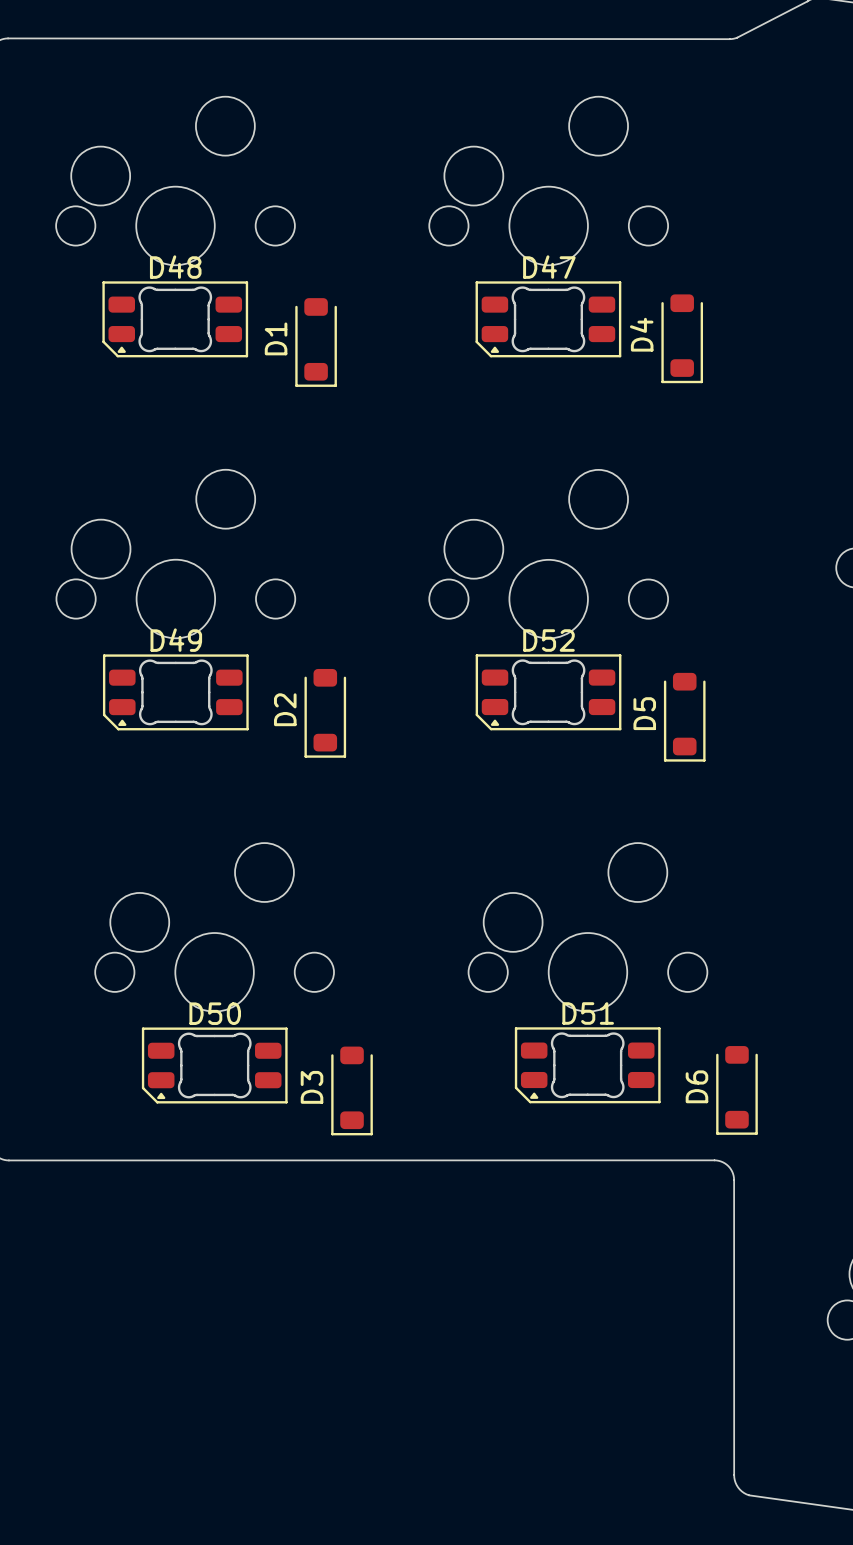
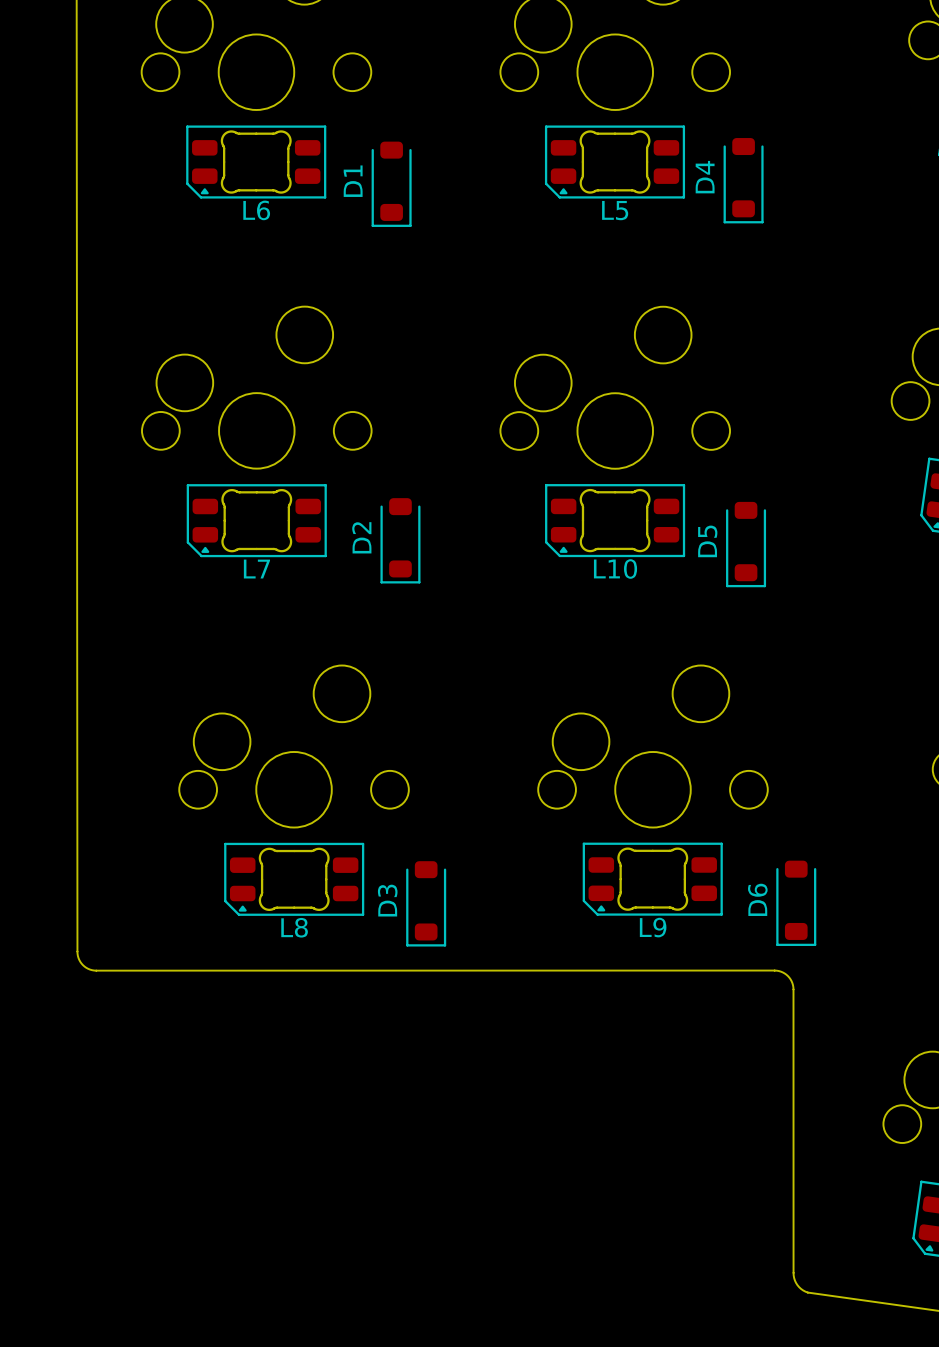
D48 name: D48 (175, 267) -> L6 (256, 210)
D47 name: D47 (549, 267) -> L5 (615, 210)
D49 name: D49 (176, 640) -> L7 (256, 569)
D52 name: D52 (549, 640) -> L10 (615, 568)
D50 name: D50 (215, 1013) -> L8 (294, 927)
D51 name: D51 (588, 1013) -> L9 (653, 927)

